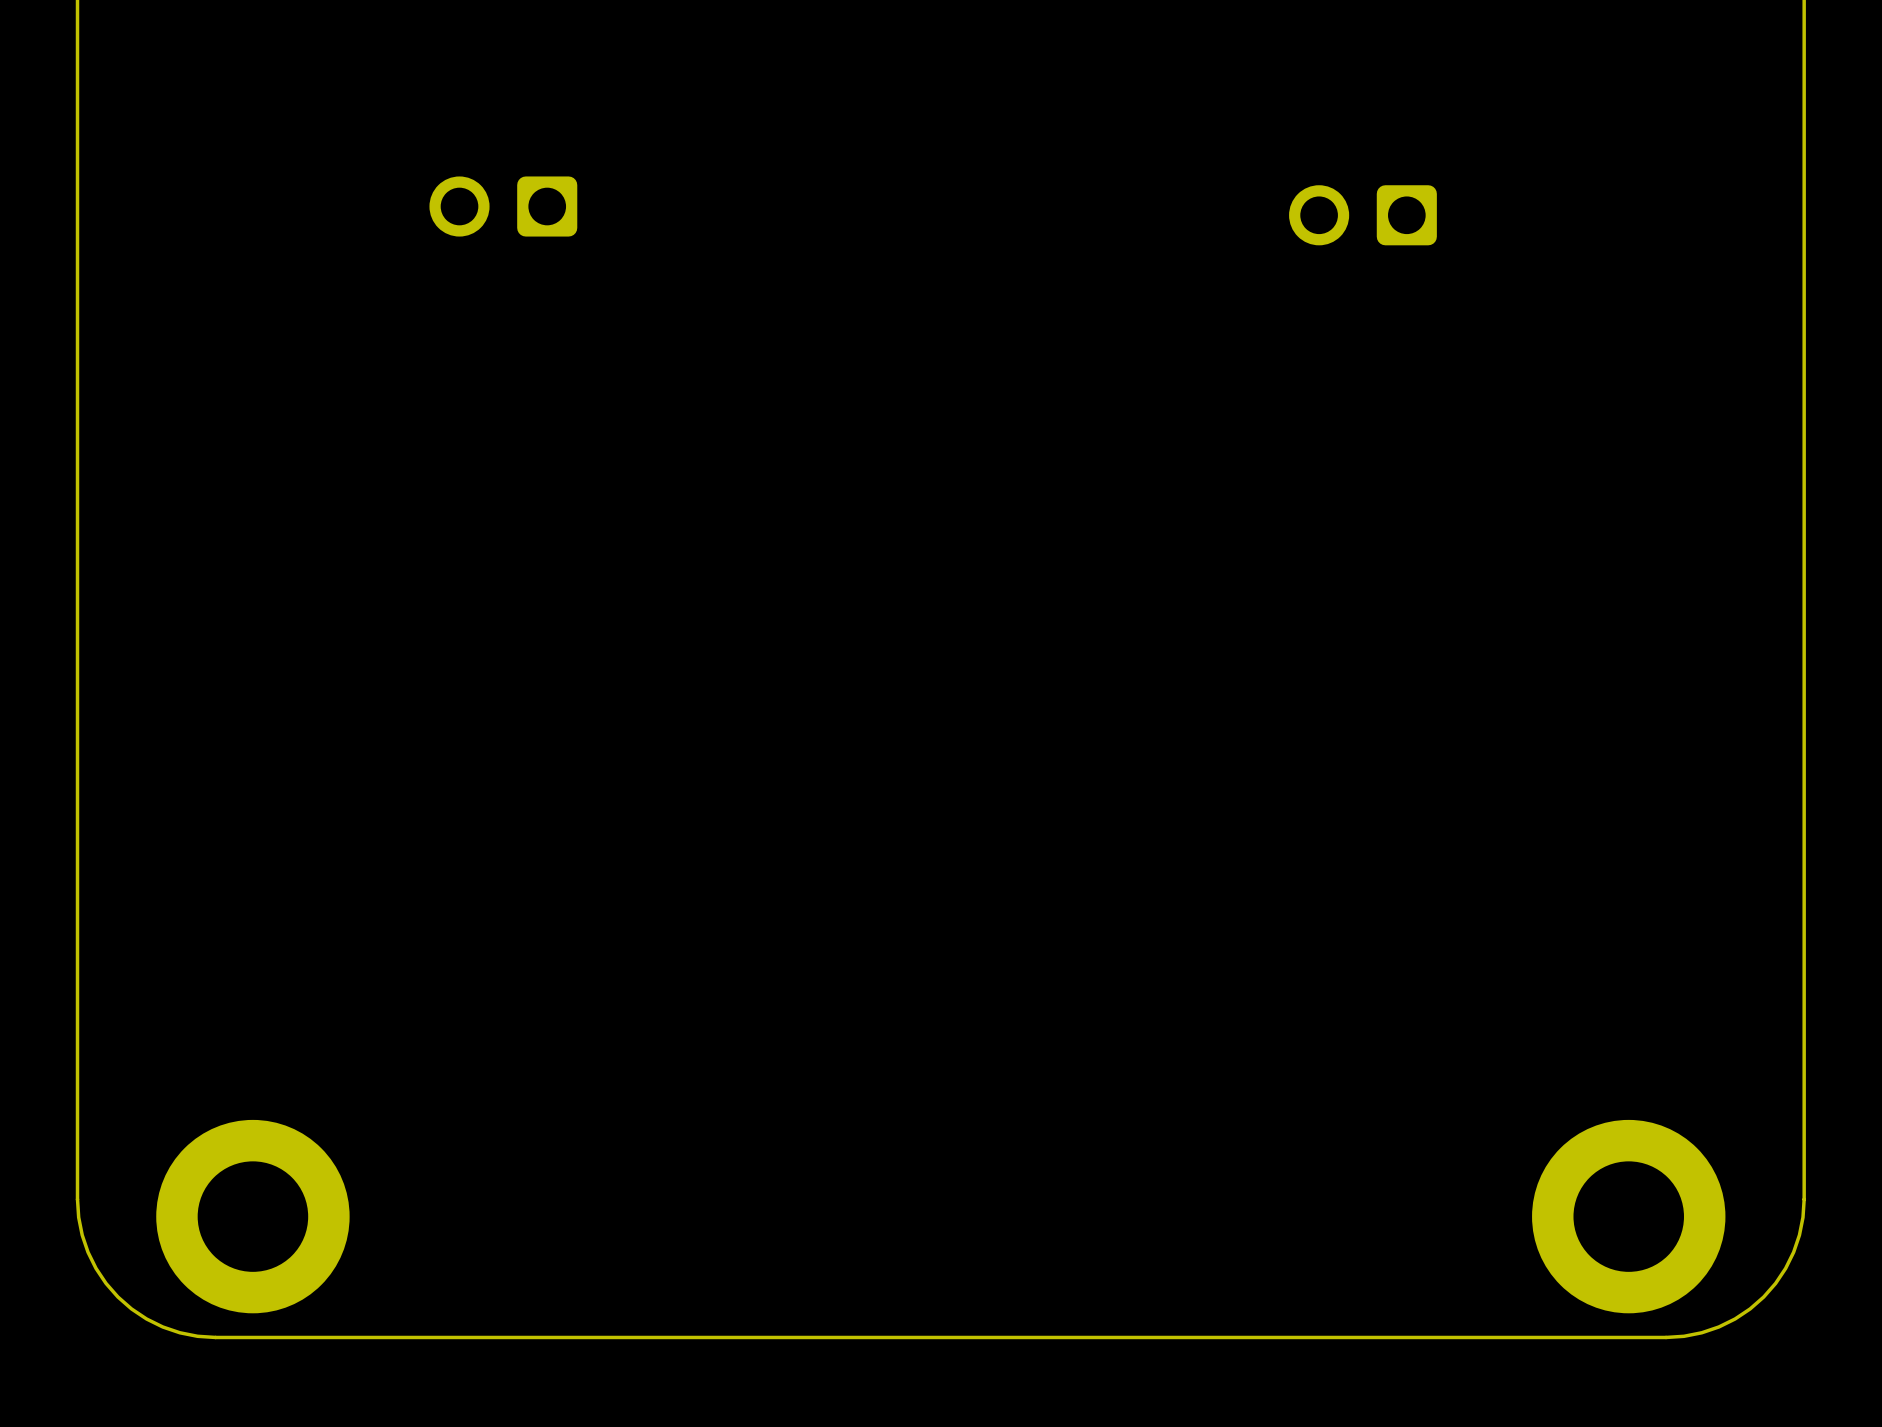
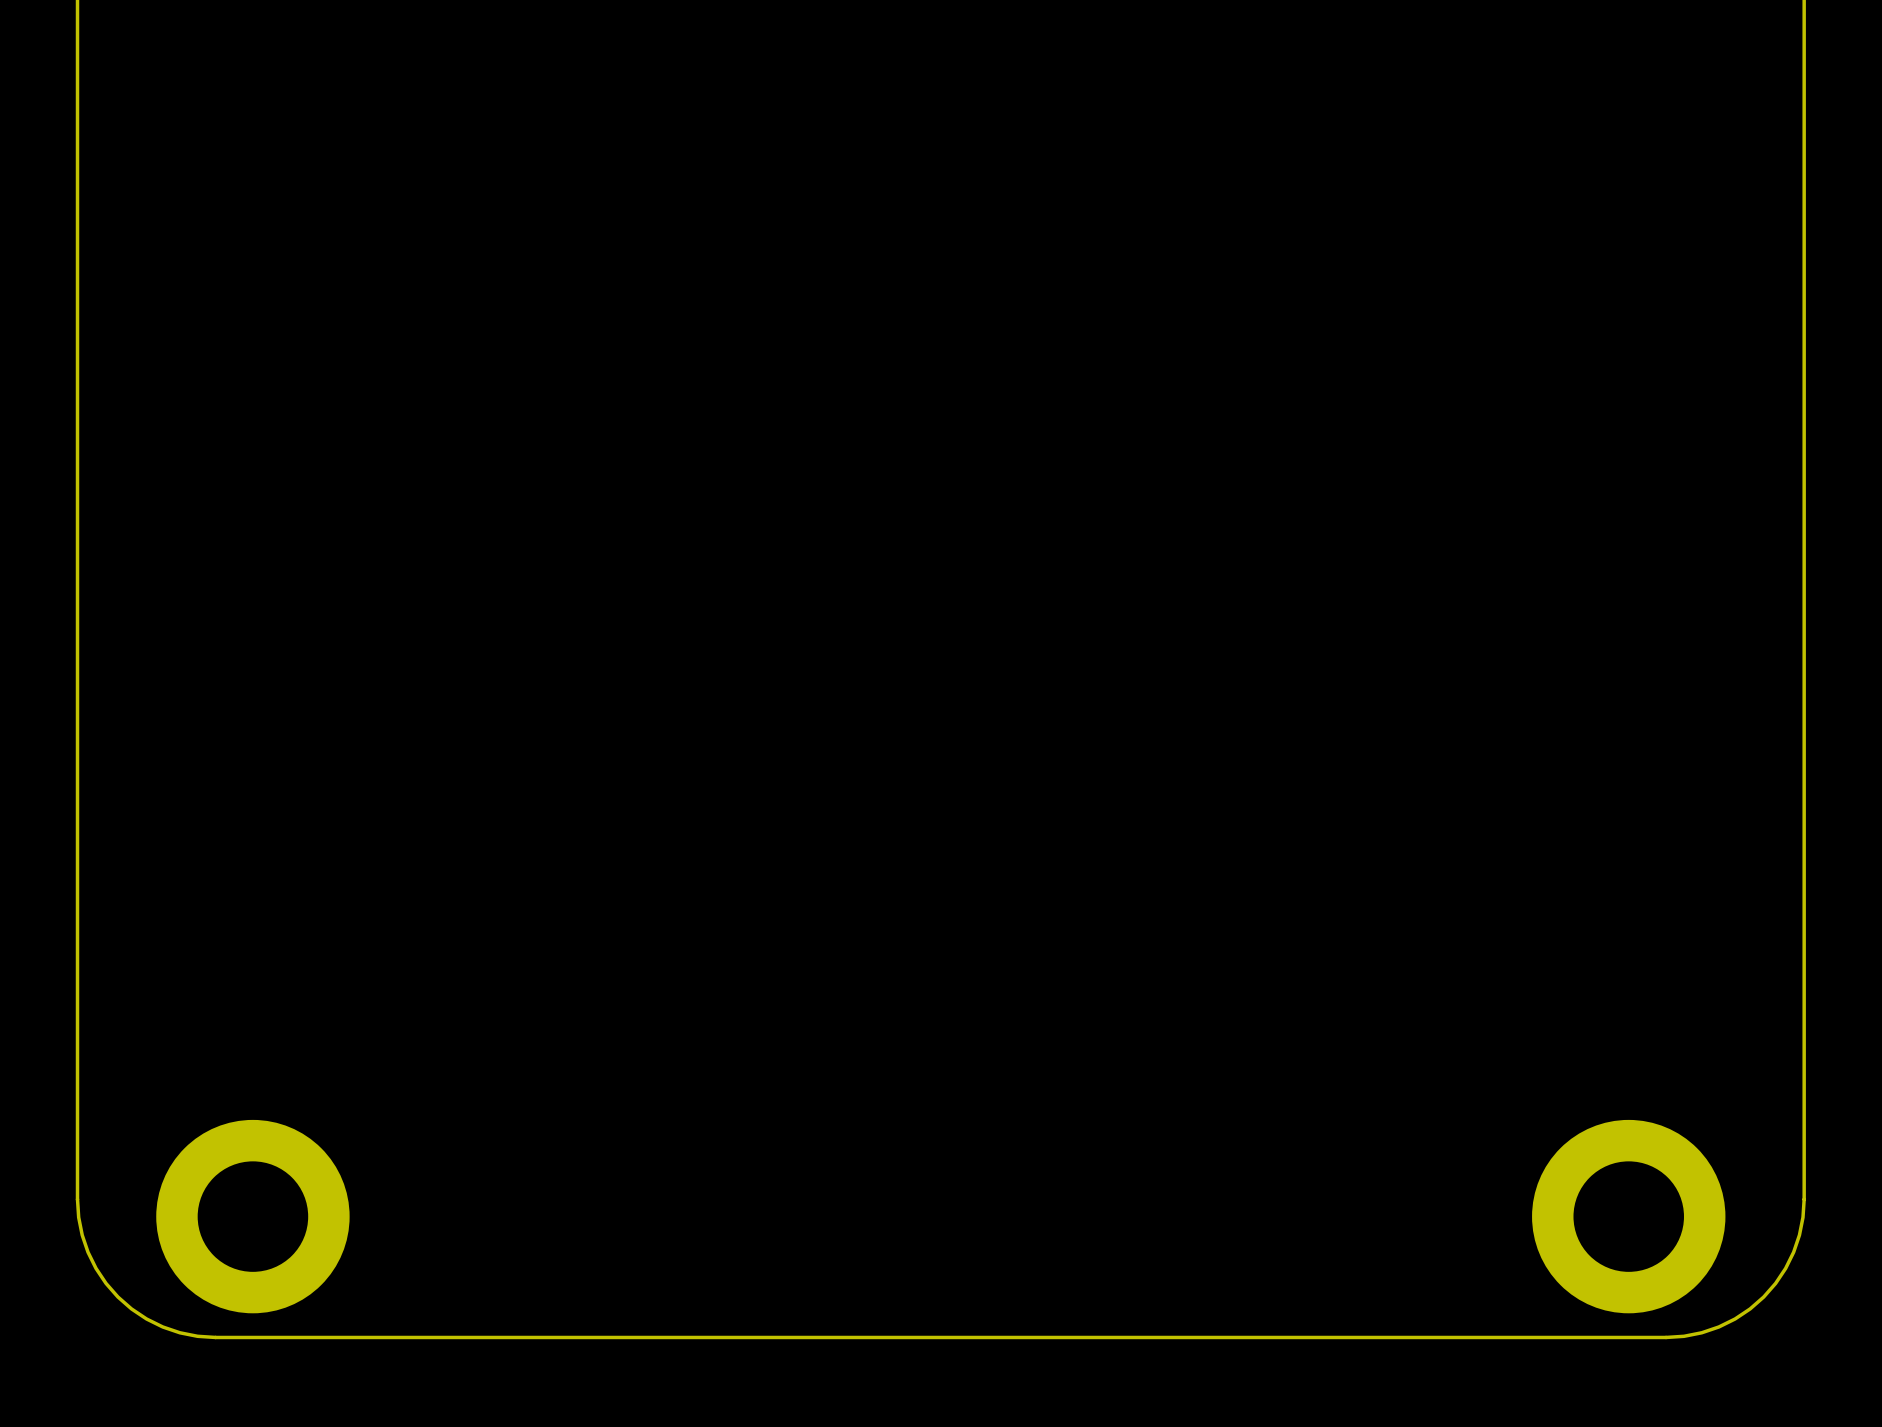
part: (503, 206) -> none
part: (1362, 215) -> none

